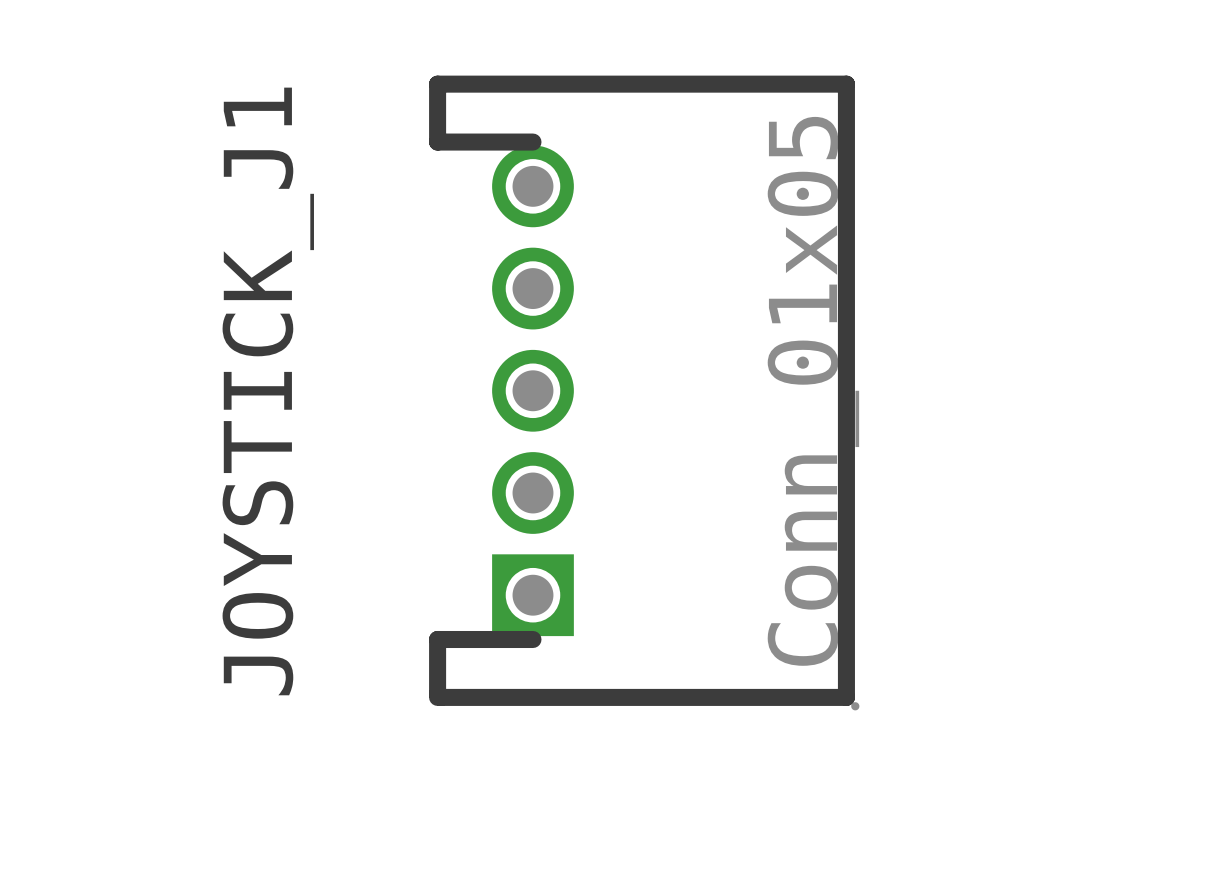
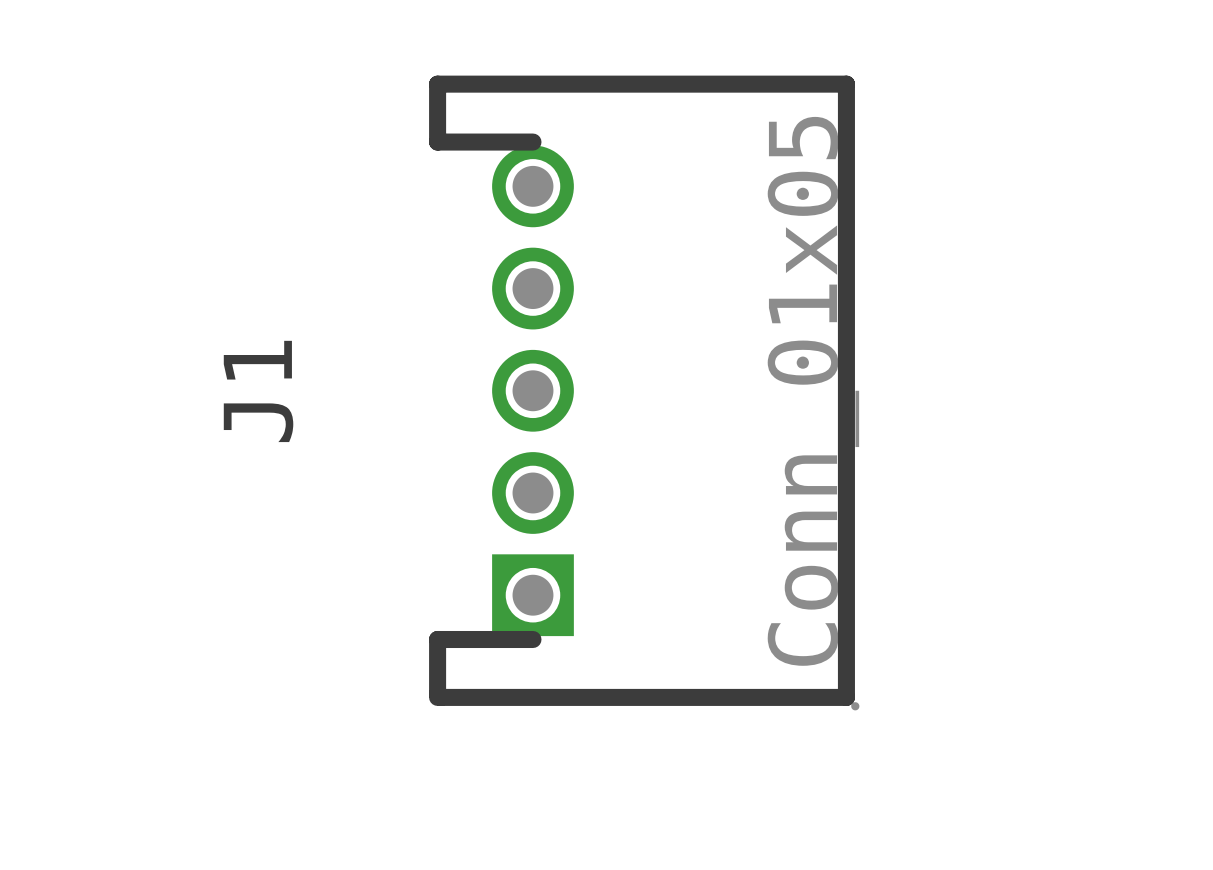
JOYSTICK_J1 name: JOYSTICK_J1 (268, 391) -> J1 (258, 391)

